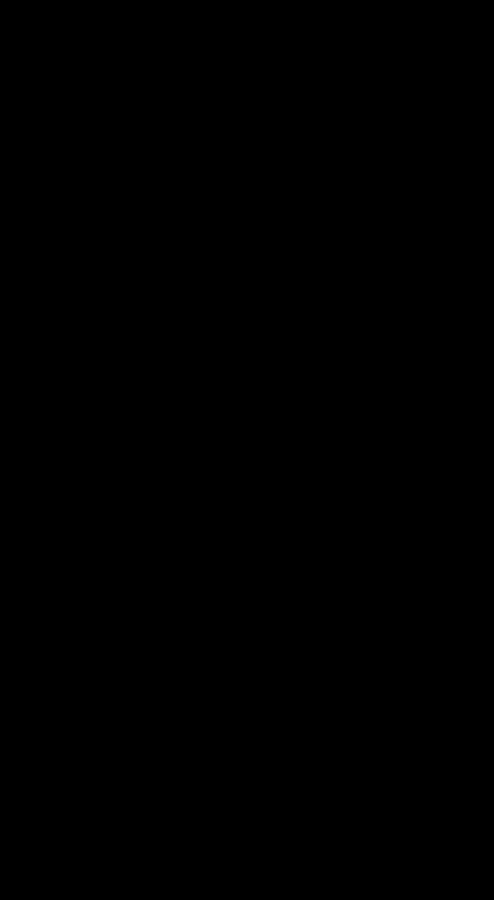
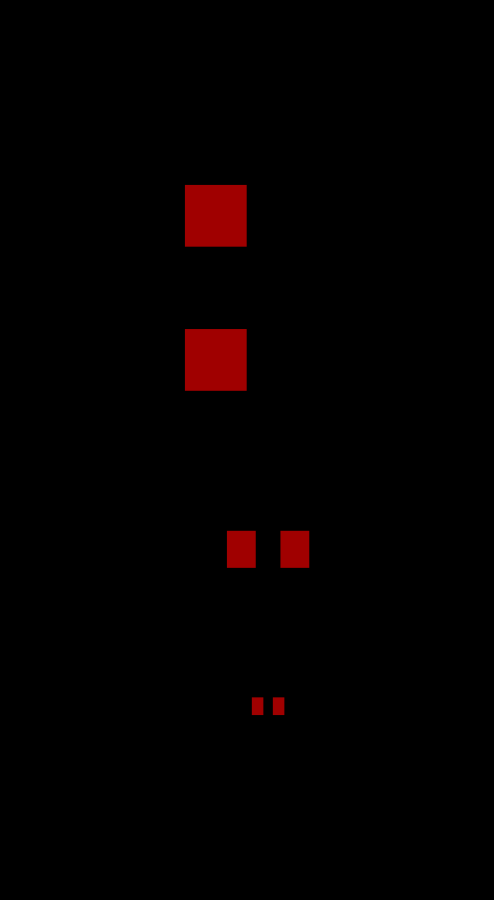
part: none -> (215, 287)
part: none -> (268, 549)
part: none -> (268, 706)

